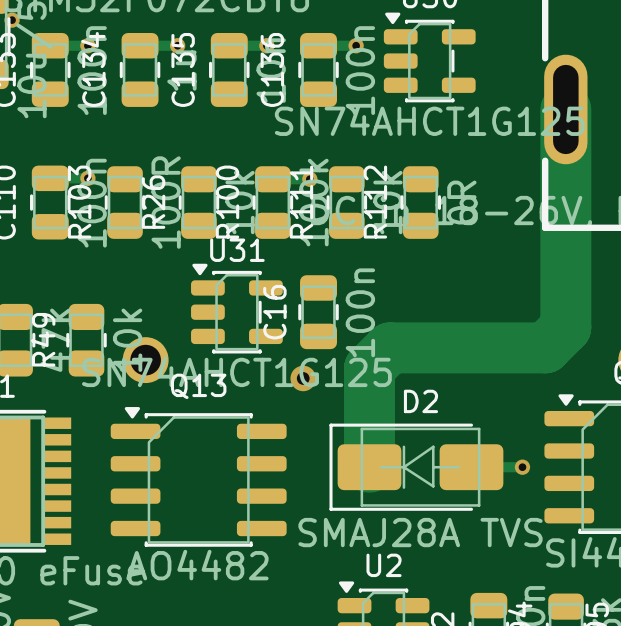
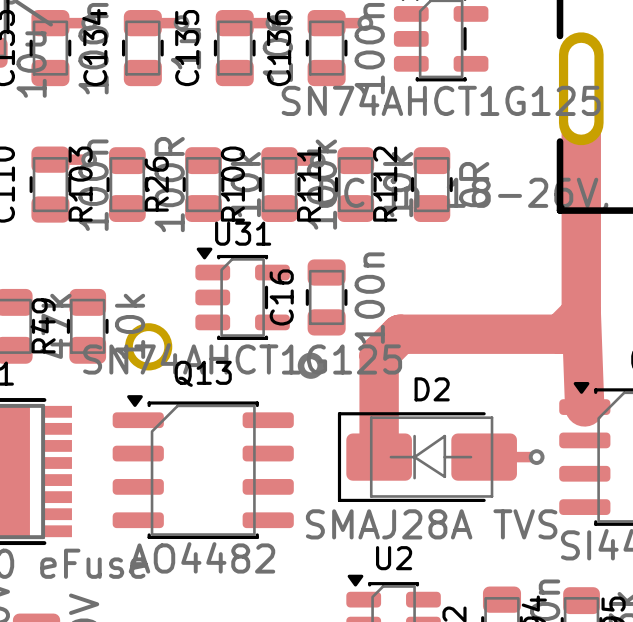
track width: thick (565, 109) (565, 327) (545, 347) (389, 347) (369, 368) (369, 467) -> thin (581, 88) (581, 313) (560, 334) (400, 334) (379, 355) (379, 457)
track: none -> (581, 313) (584, 406)

